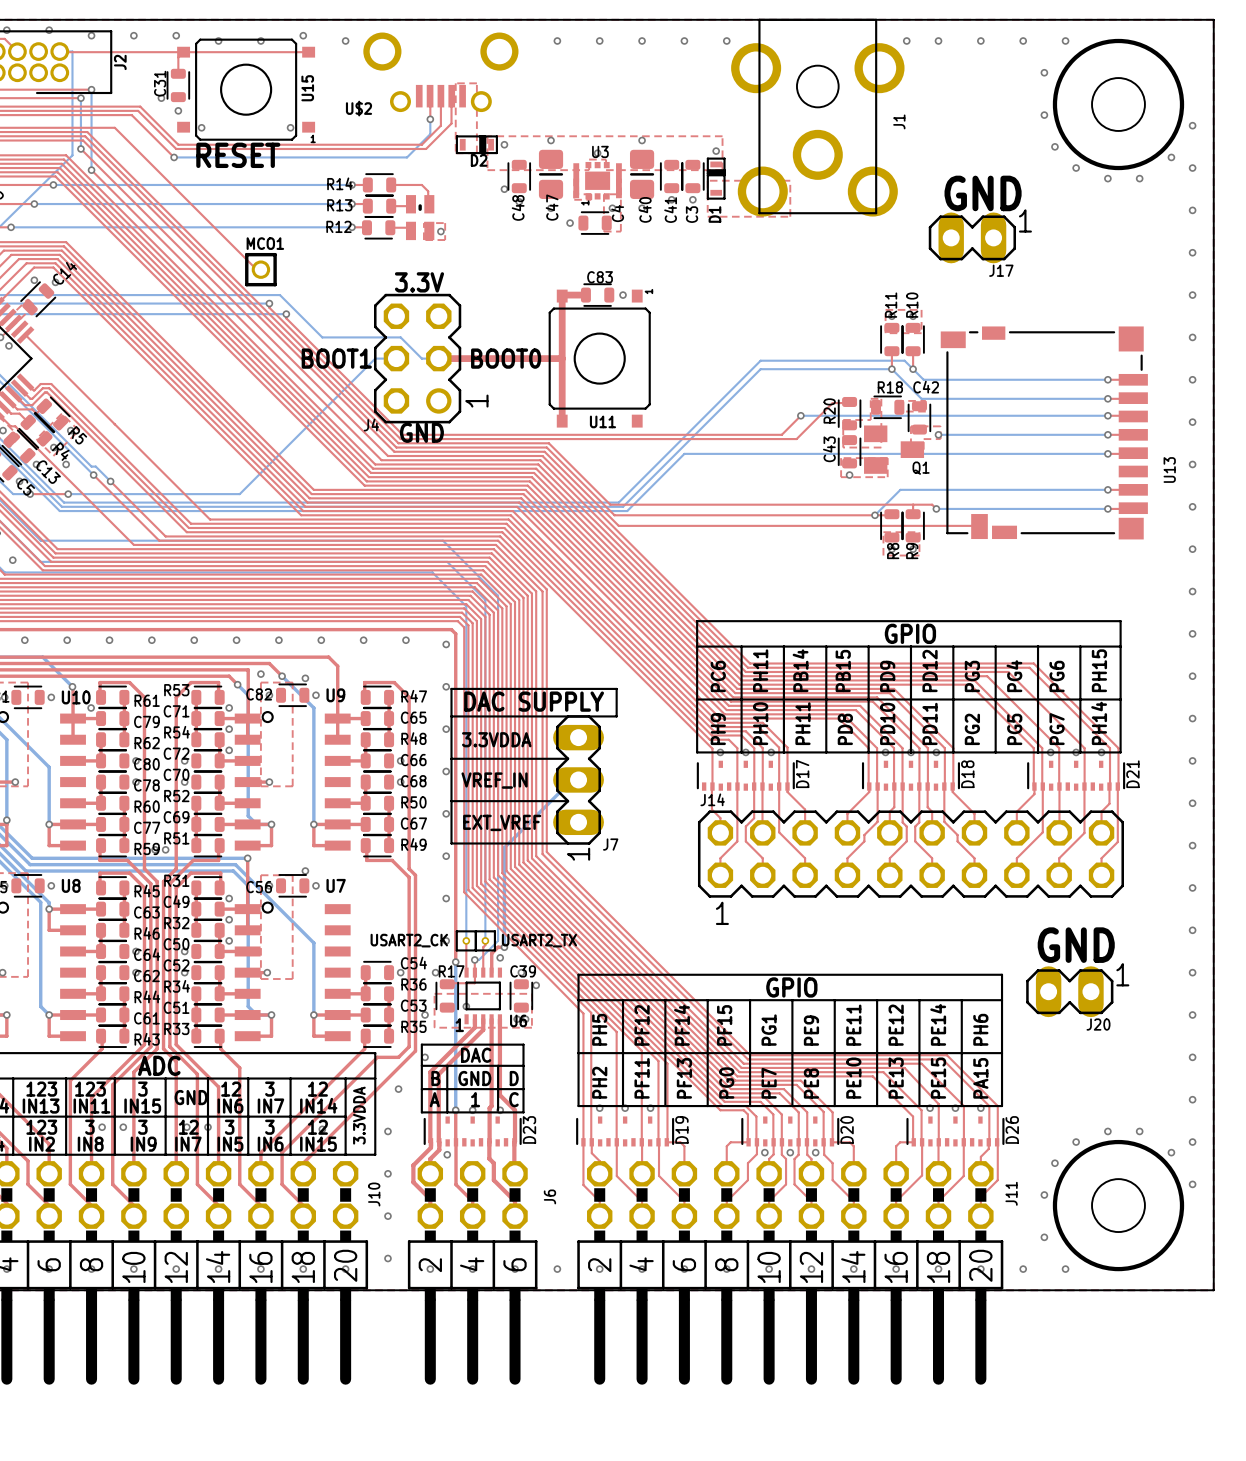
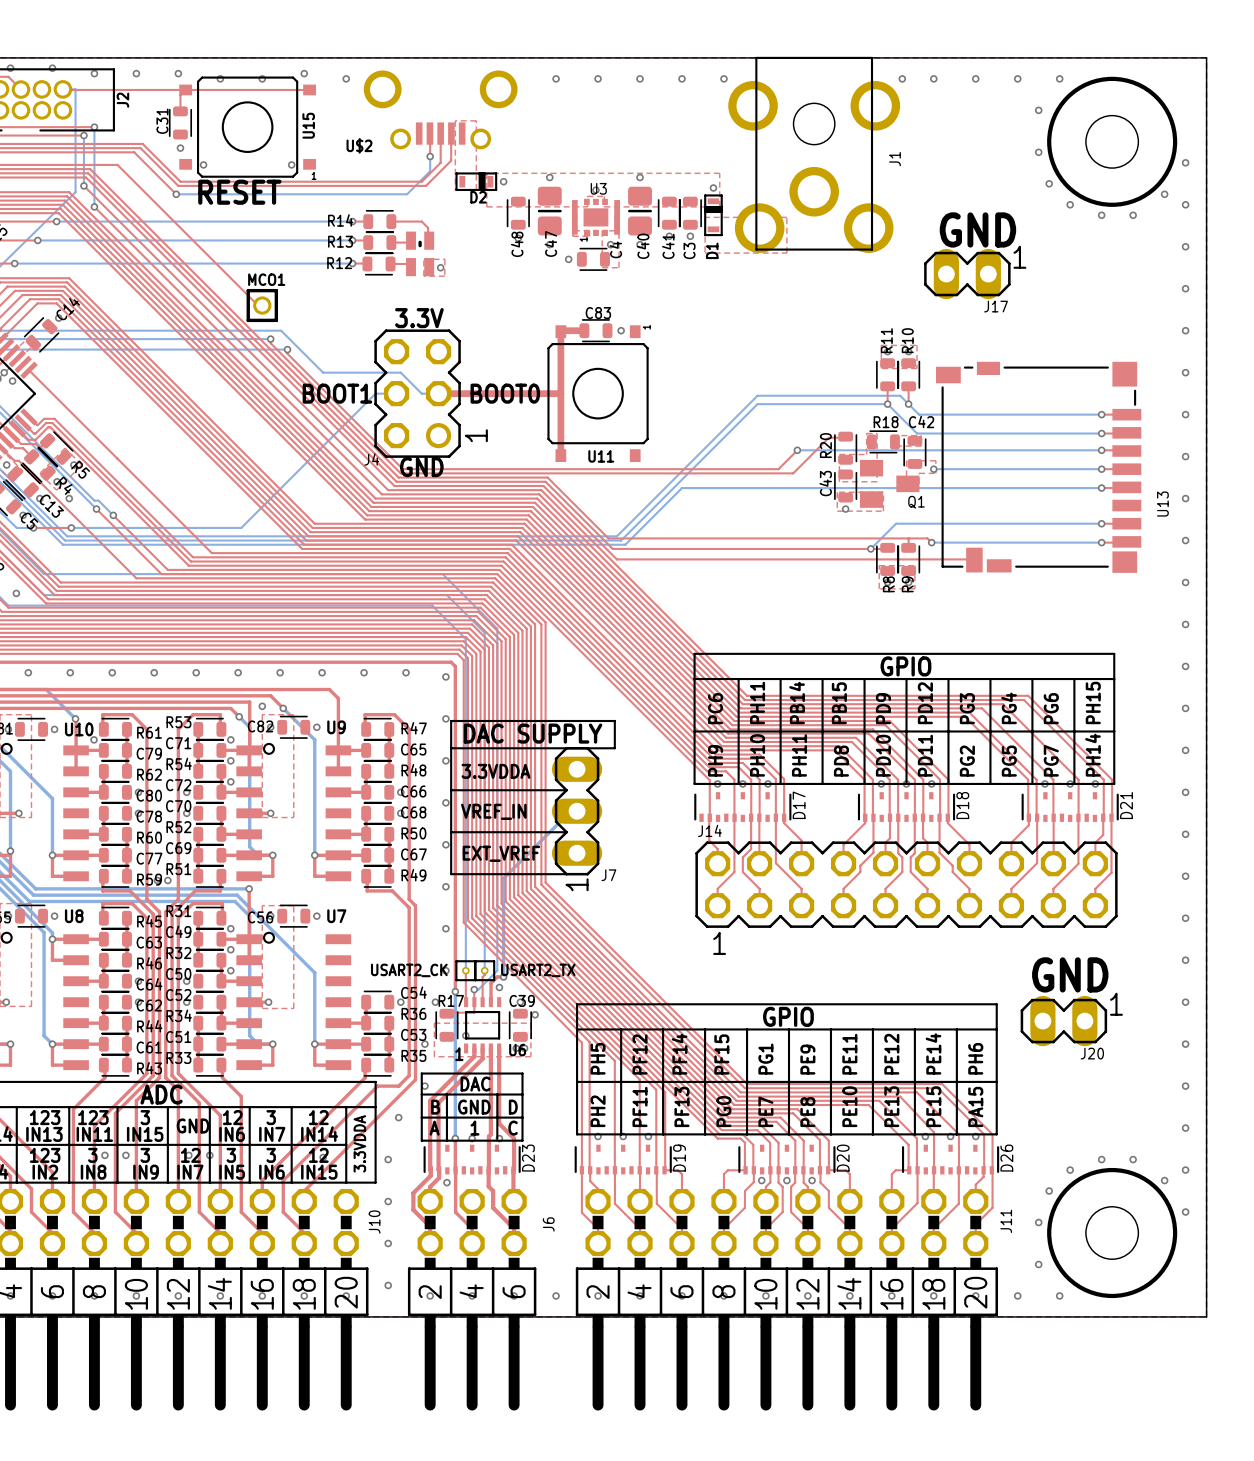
via: (161, 98) -> none
via: (504, 189) -> none
via: (34, 280) -> none
via: (305, 678) -> none
via: (305, 871) -> none

